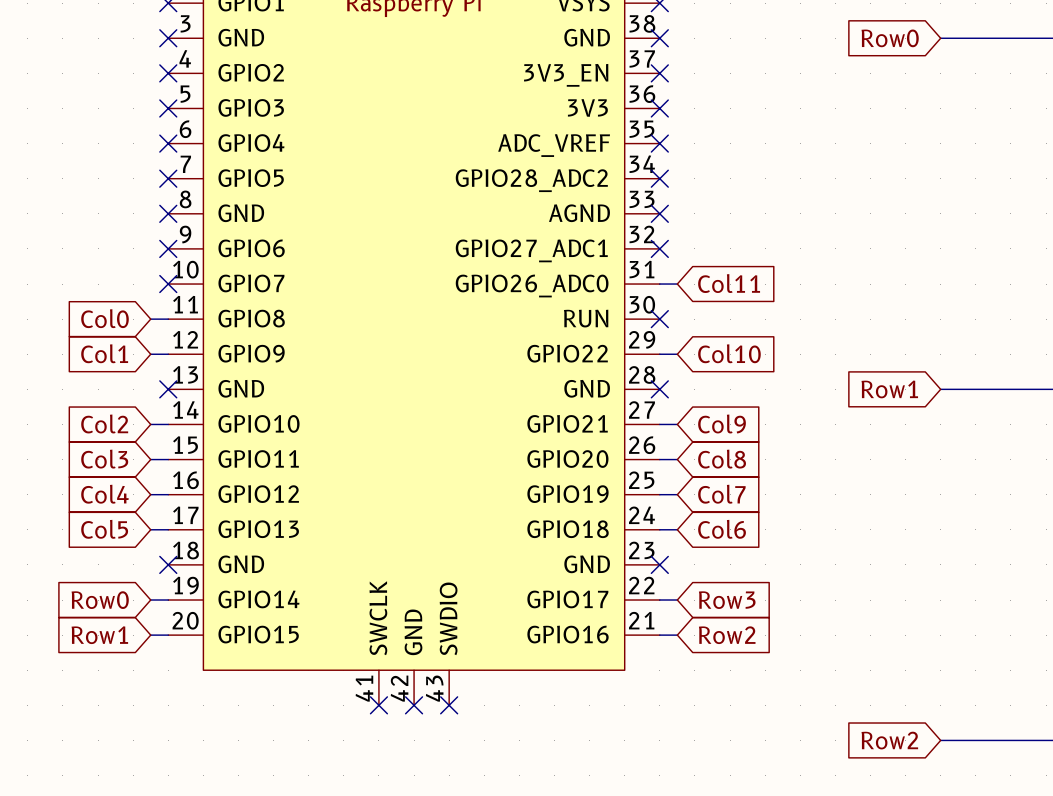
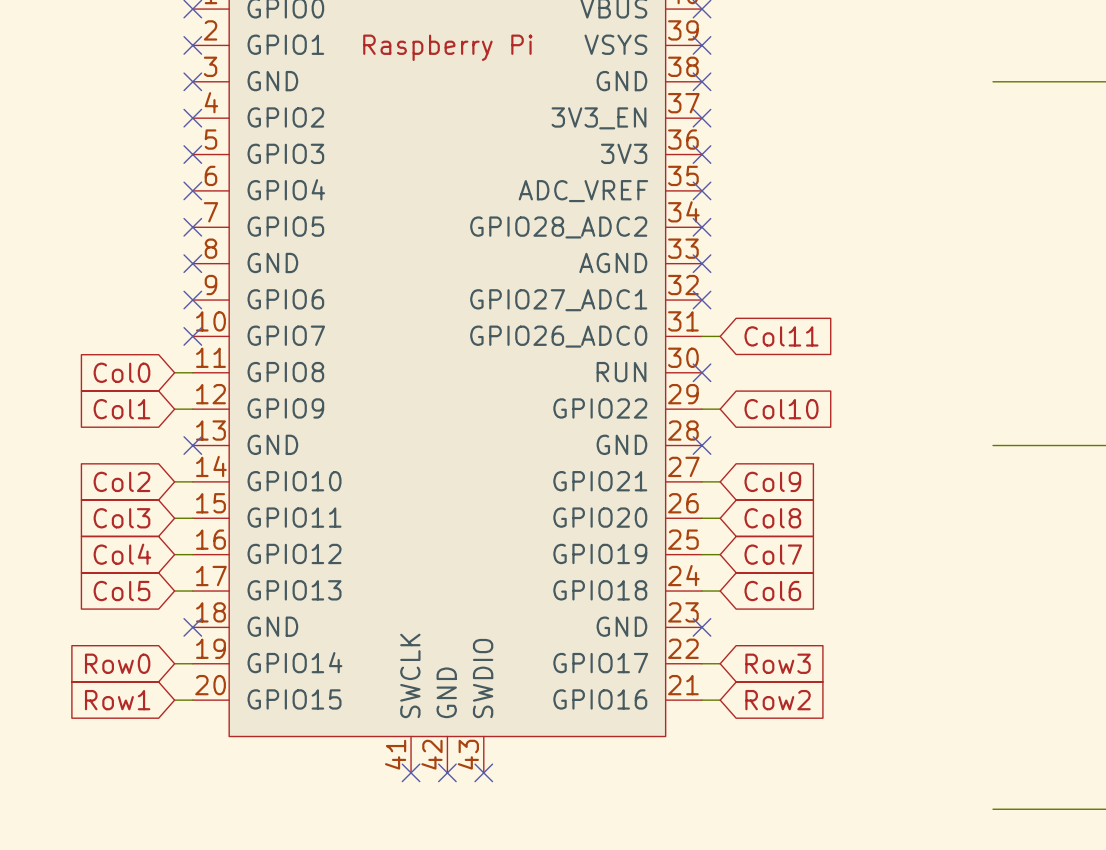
global label: Row0 (890, 38) -> none
global label: Row1 (889, 389) -> none
global label: Row2 (889, 740) -> none

